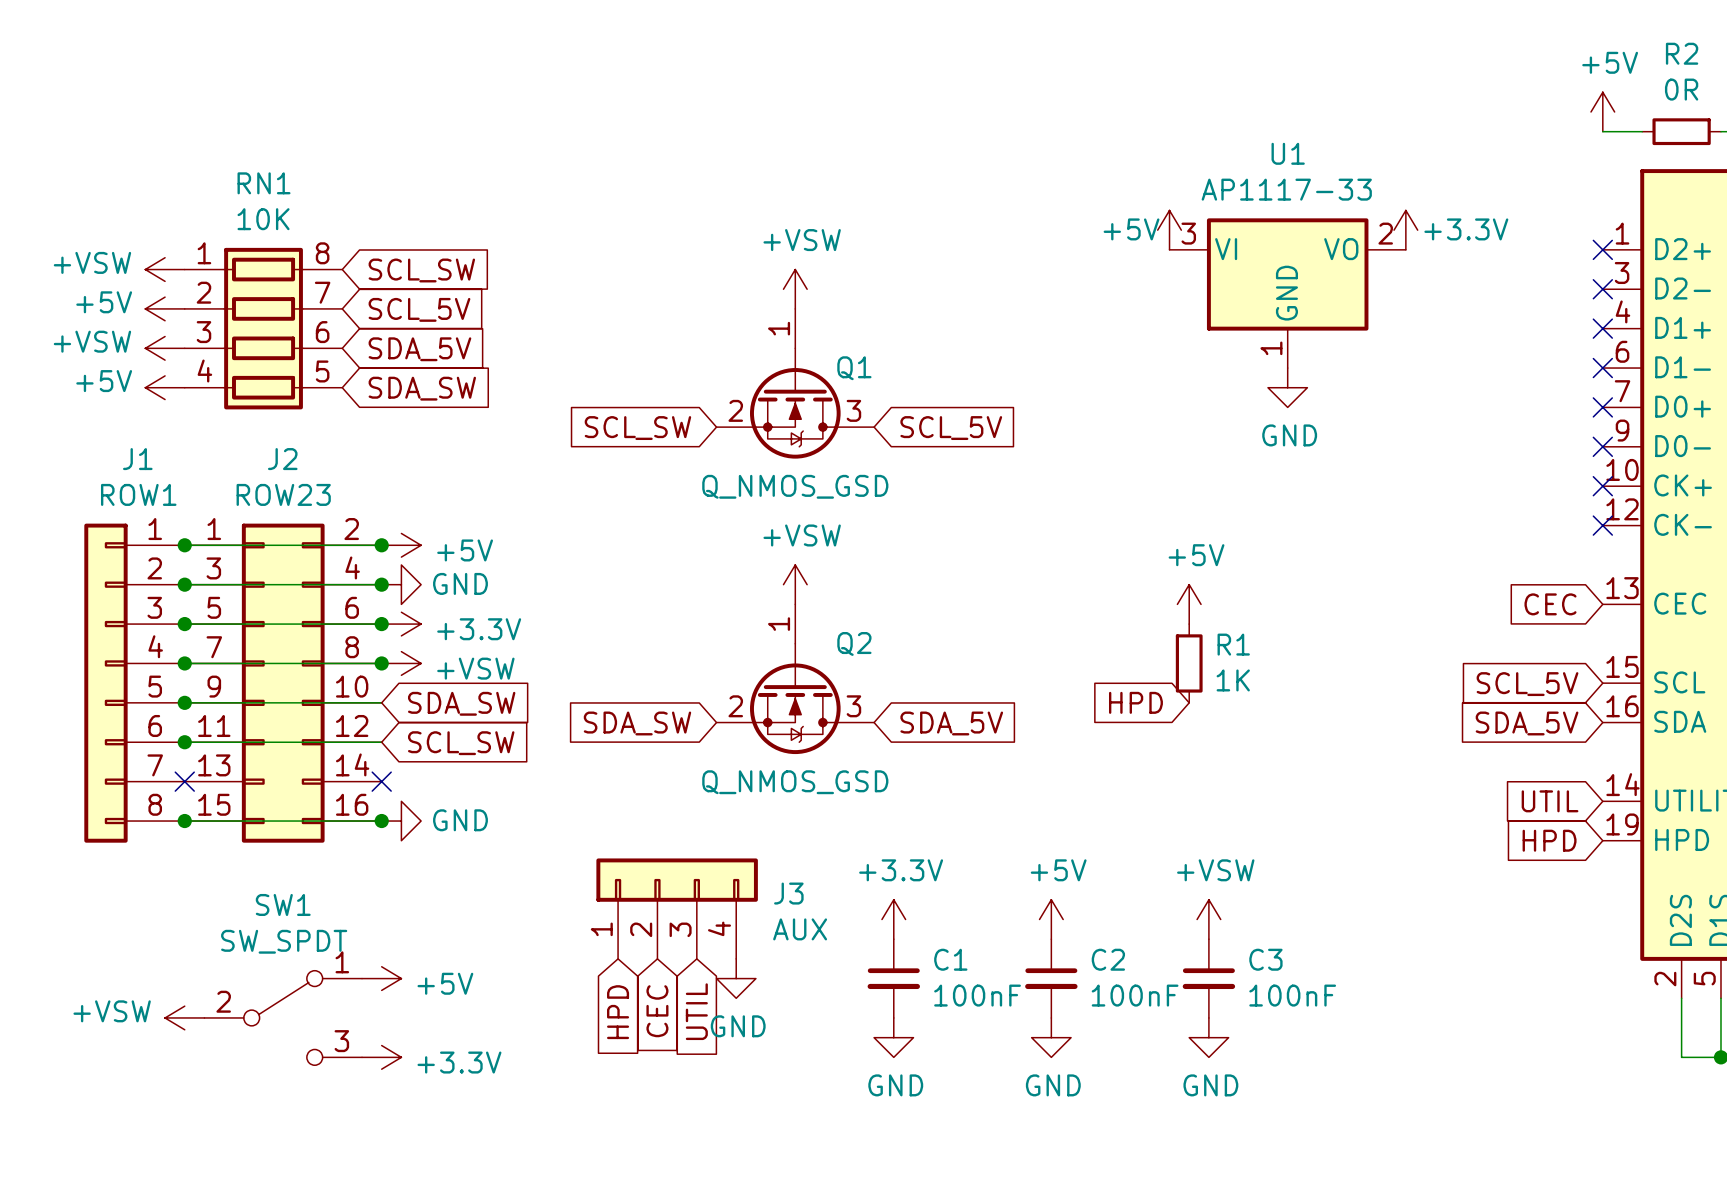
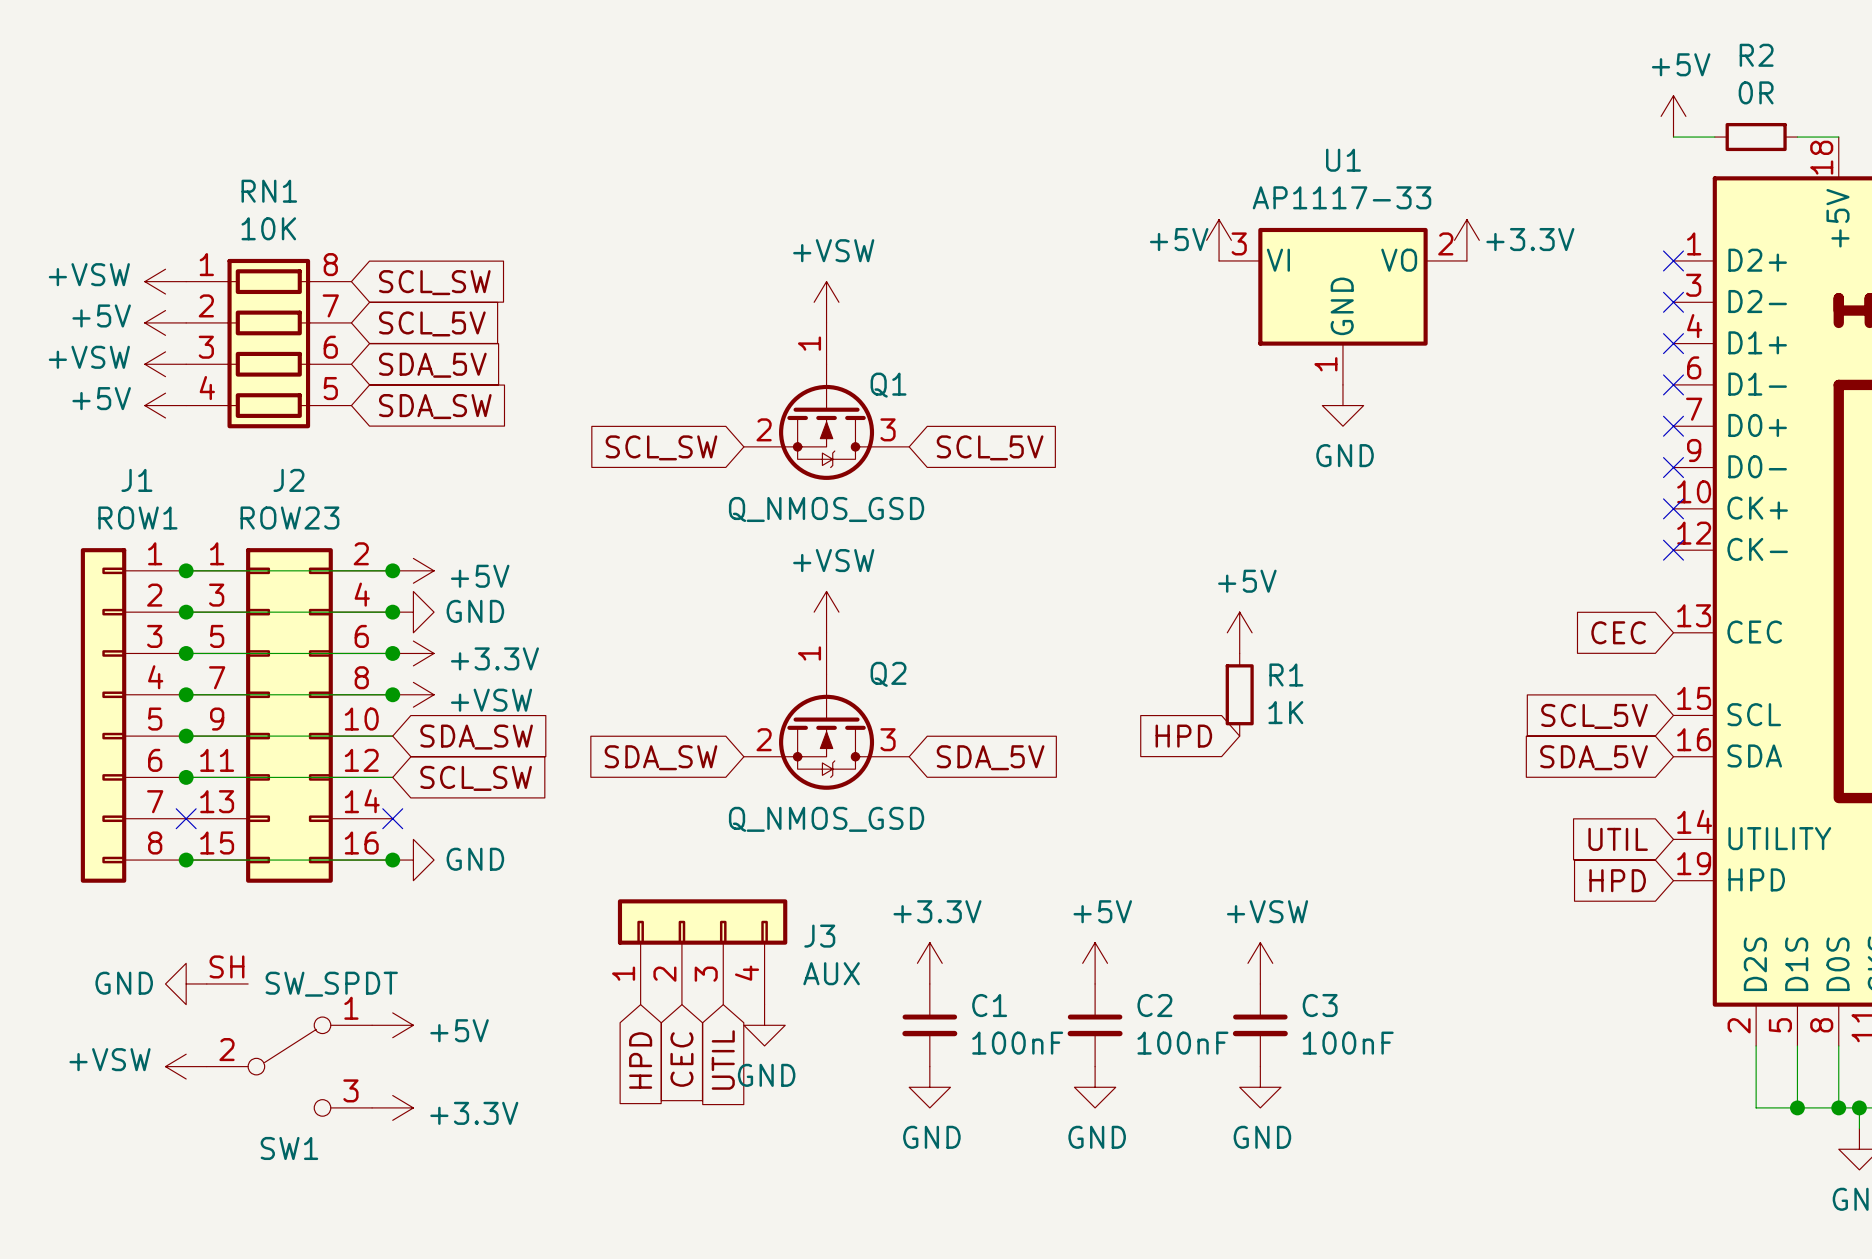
SW1 name position: SW1 (283, 904) -> SW1 (289, 1148)
power symbol: none -> GND (186, 983)
SW1 value position: SW_SPDT (284, 941) -> SW_SPDT (331, 984)
SW1 symbol: [204, 970, 363, 1066] -> [206, 983, 373, 1117]

